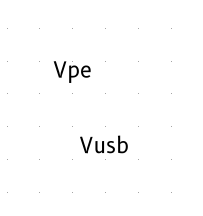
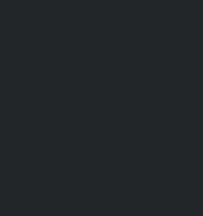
label: Vpe (72, 72) -> none
label: Vusb (103, 144) -> none

